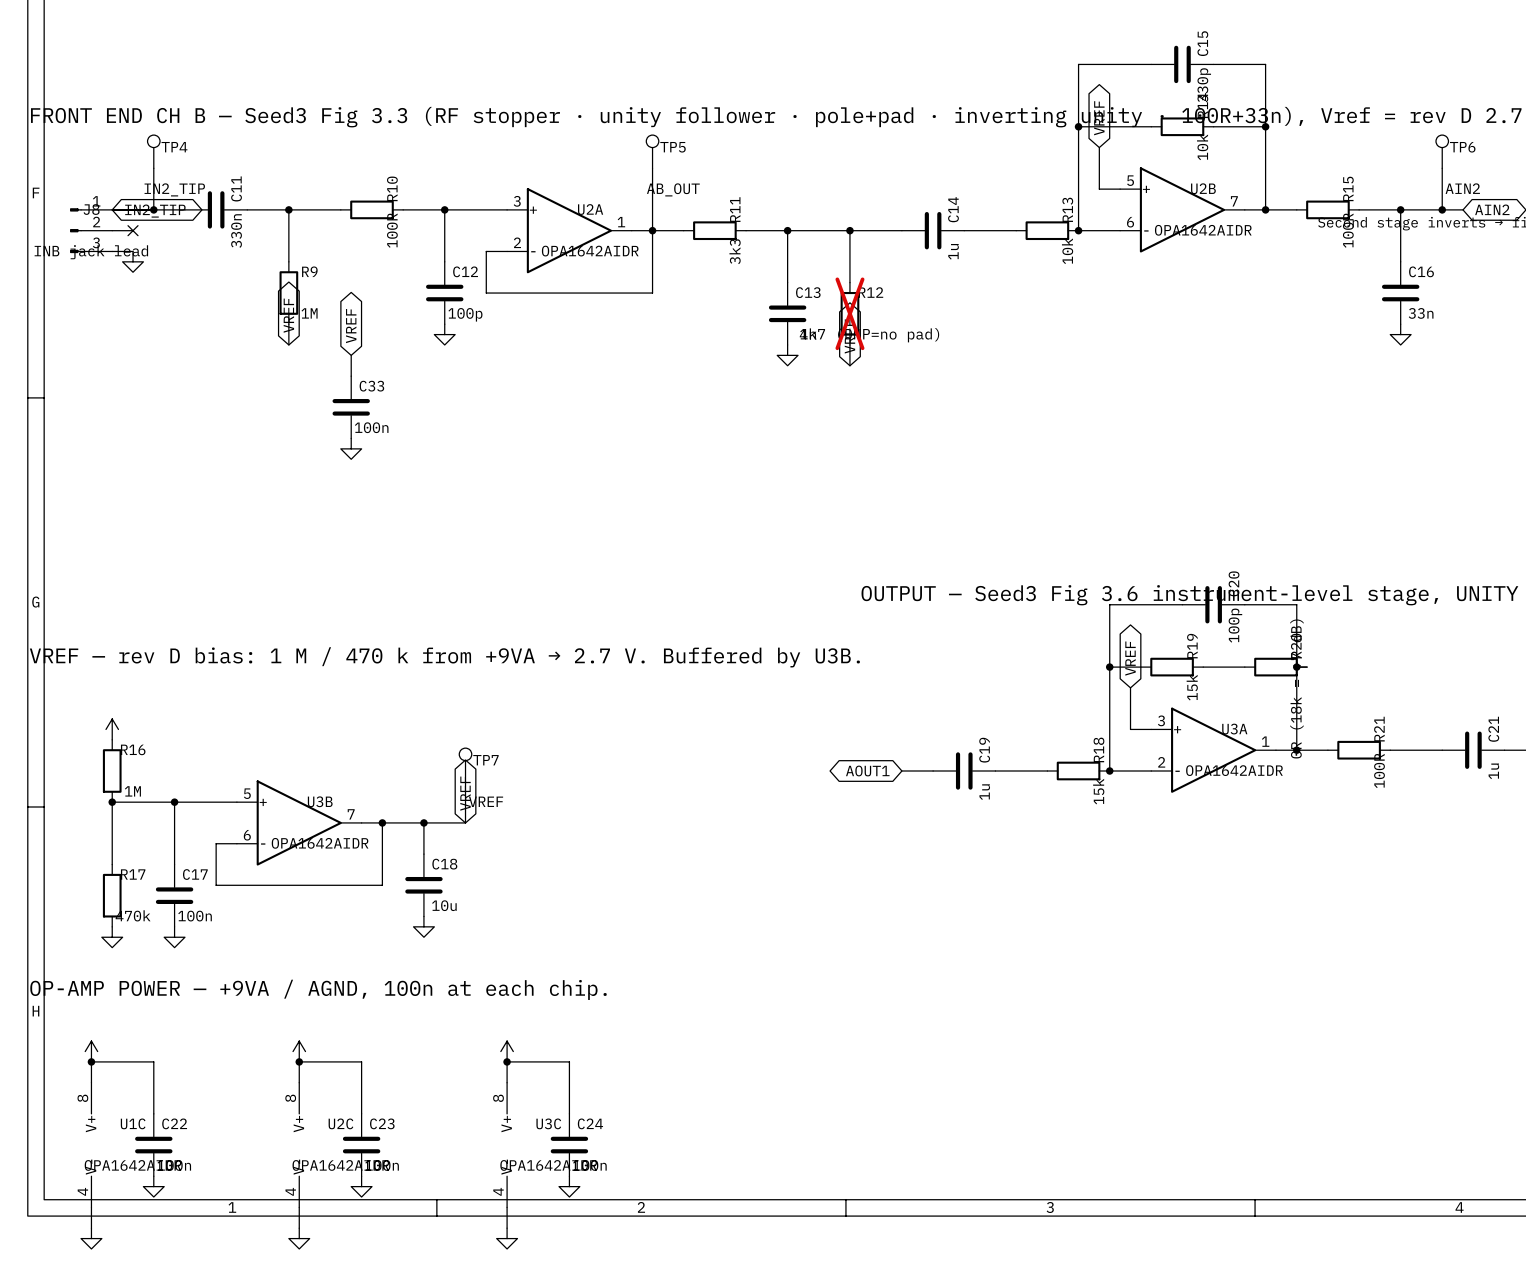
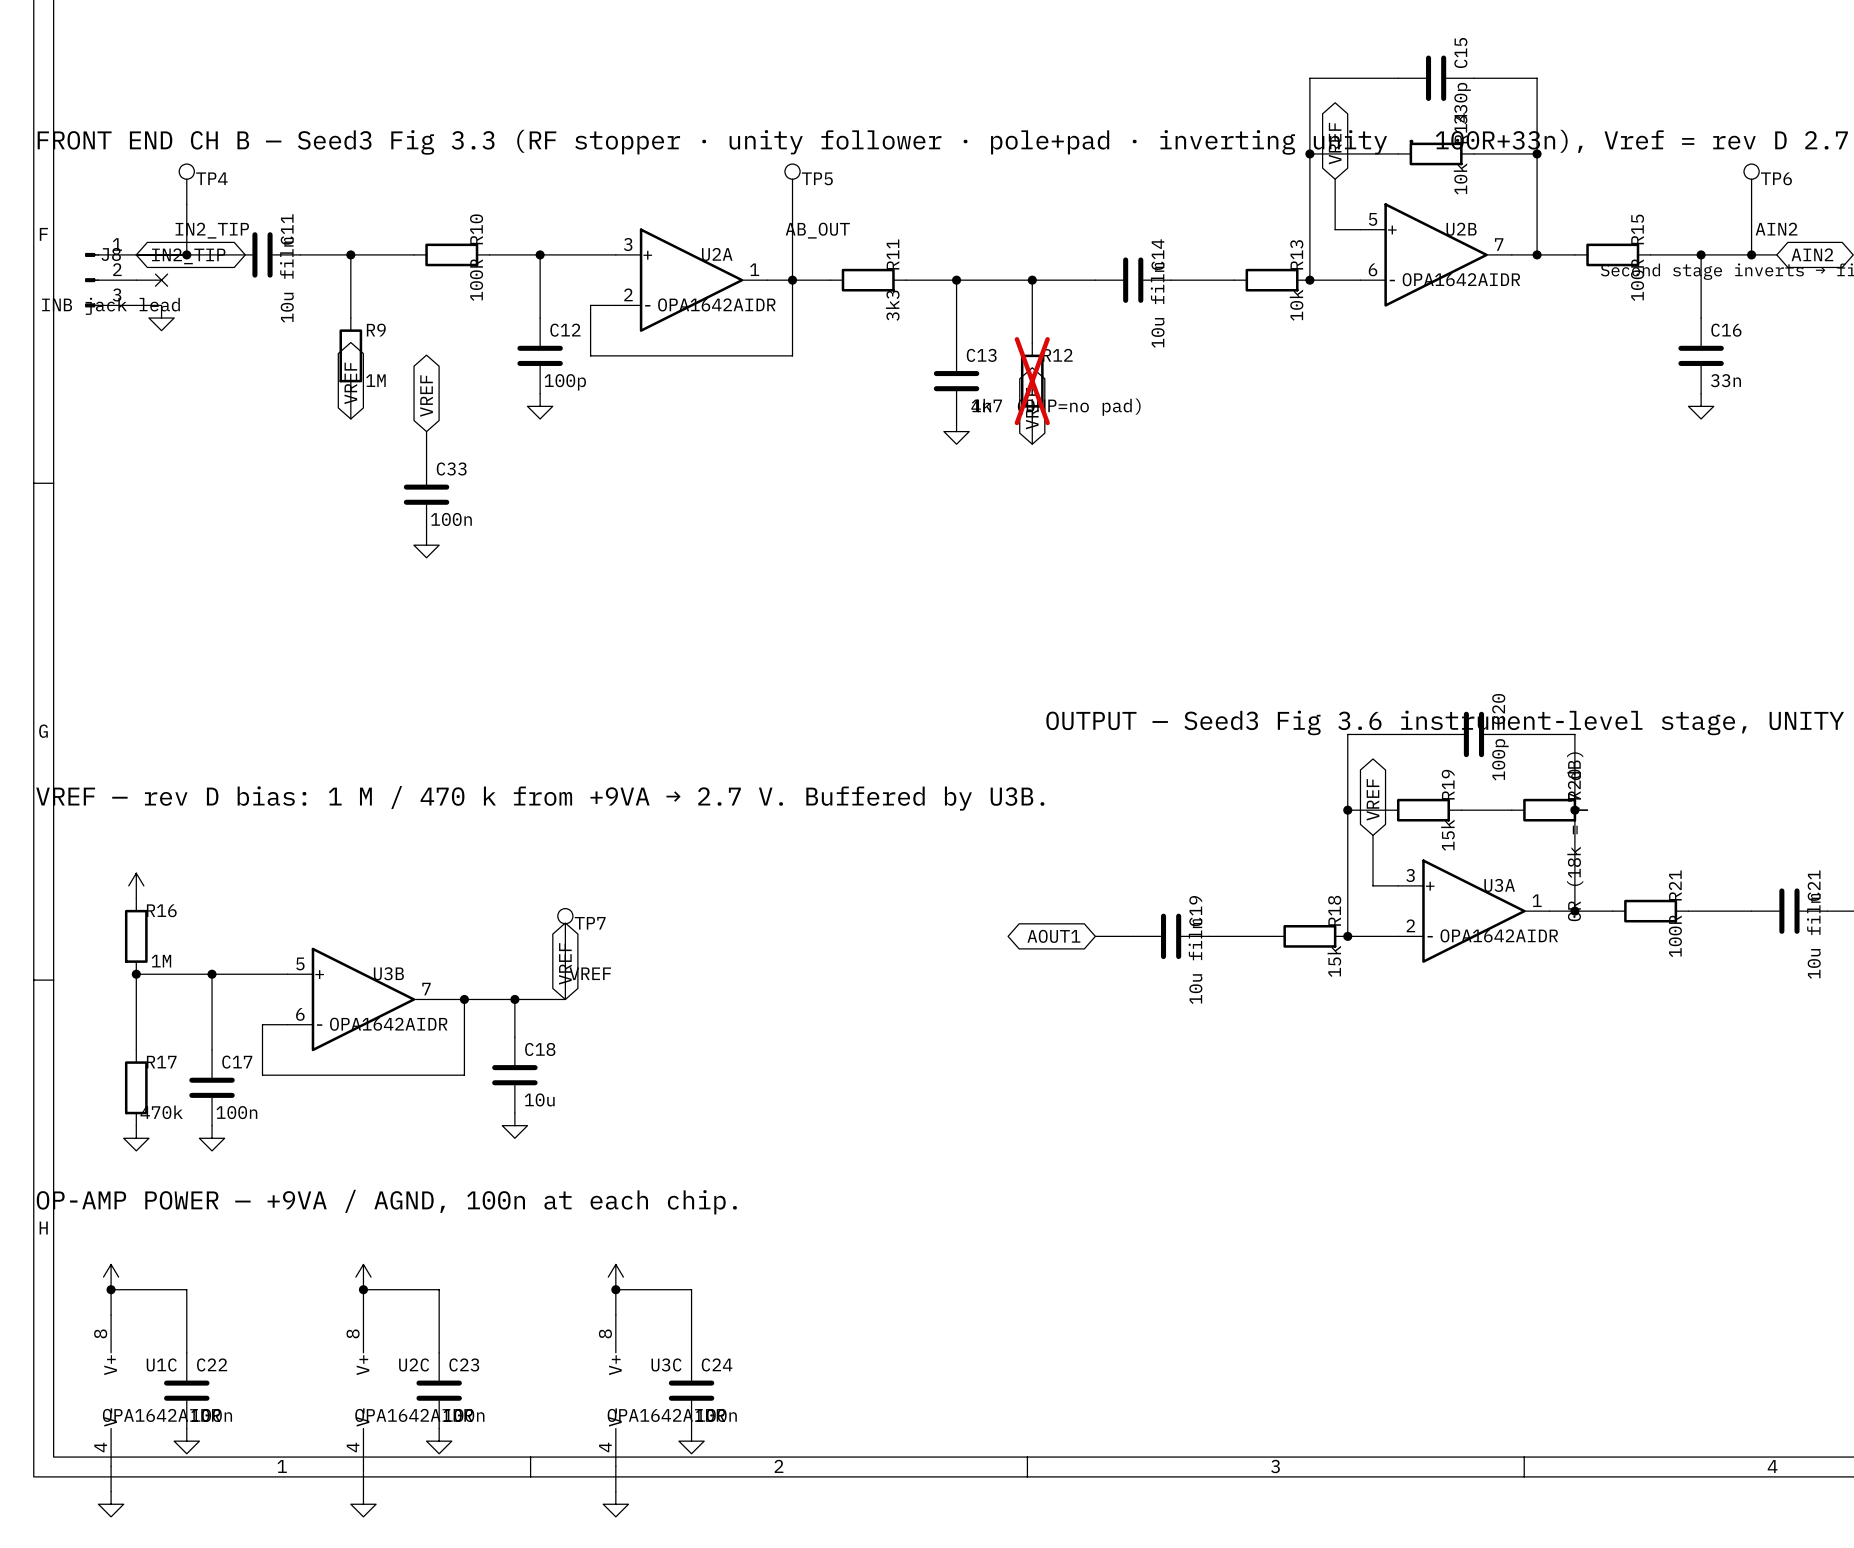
C11 value: 330n (236, 231) -> 10u film (286, 280)
C14 value: 1u (953, 251) -> 10u film (1157, 305)
C21 value: 1u (1493, 771) -> 10u film (1813, 936)
C19 value: 1u (984, 792) -> 10u film (1195, 961)

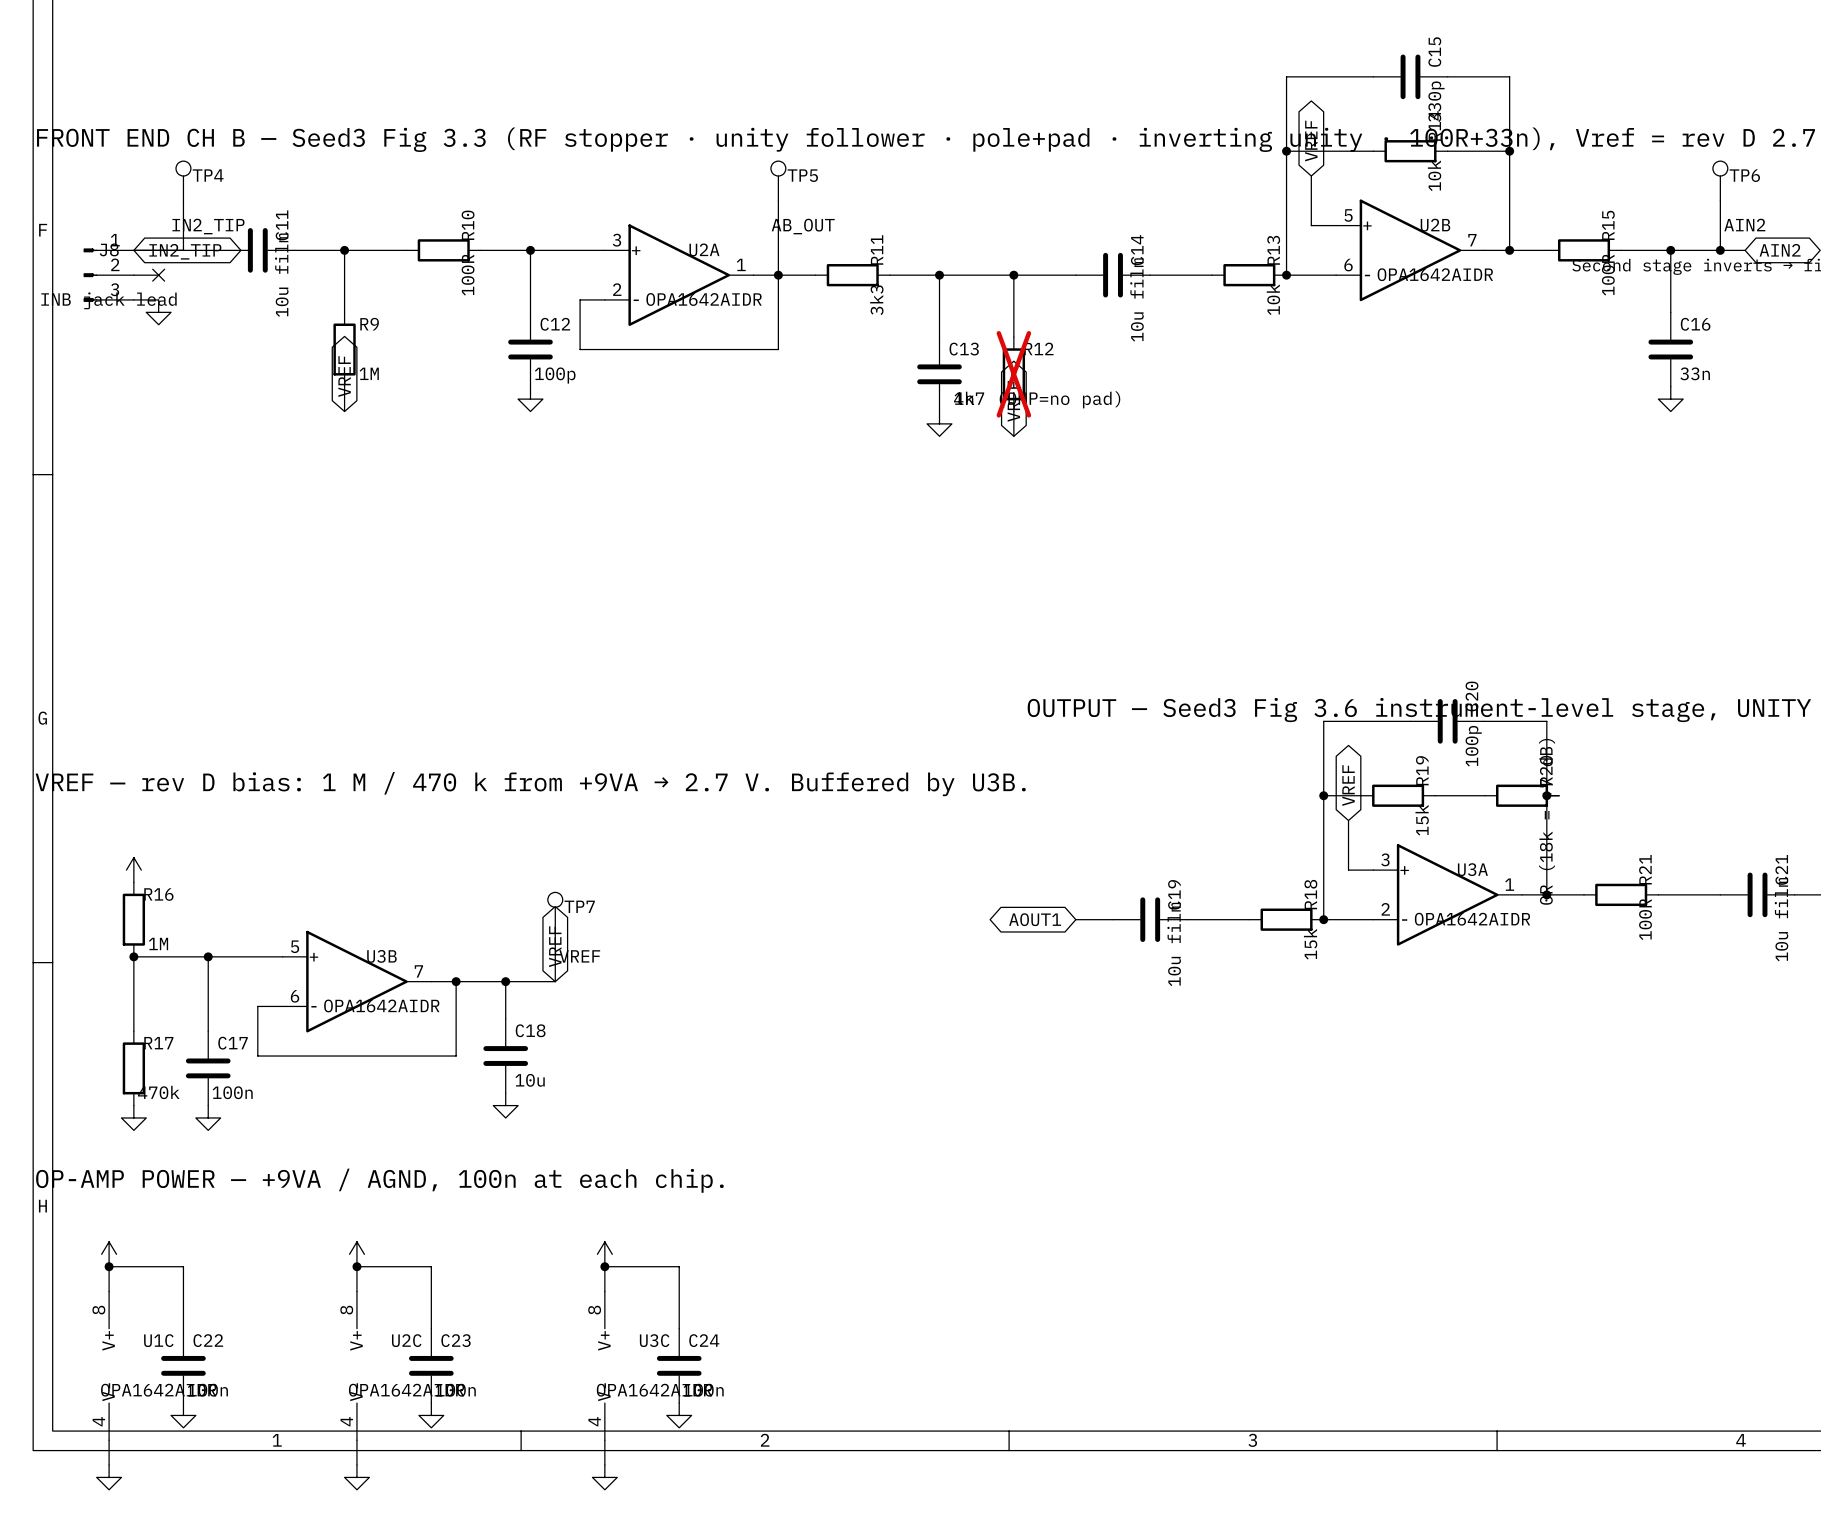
junction: (186, 254) -> none
global label: VREF (426, 396) -> none
wire: (426, 431) (426, 456) -> none
C33: 100n (426, 494) -> none
power symbol: (426, 545) -> none

